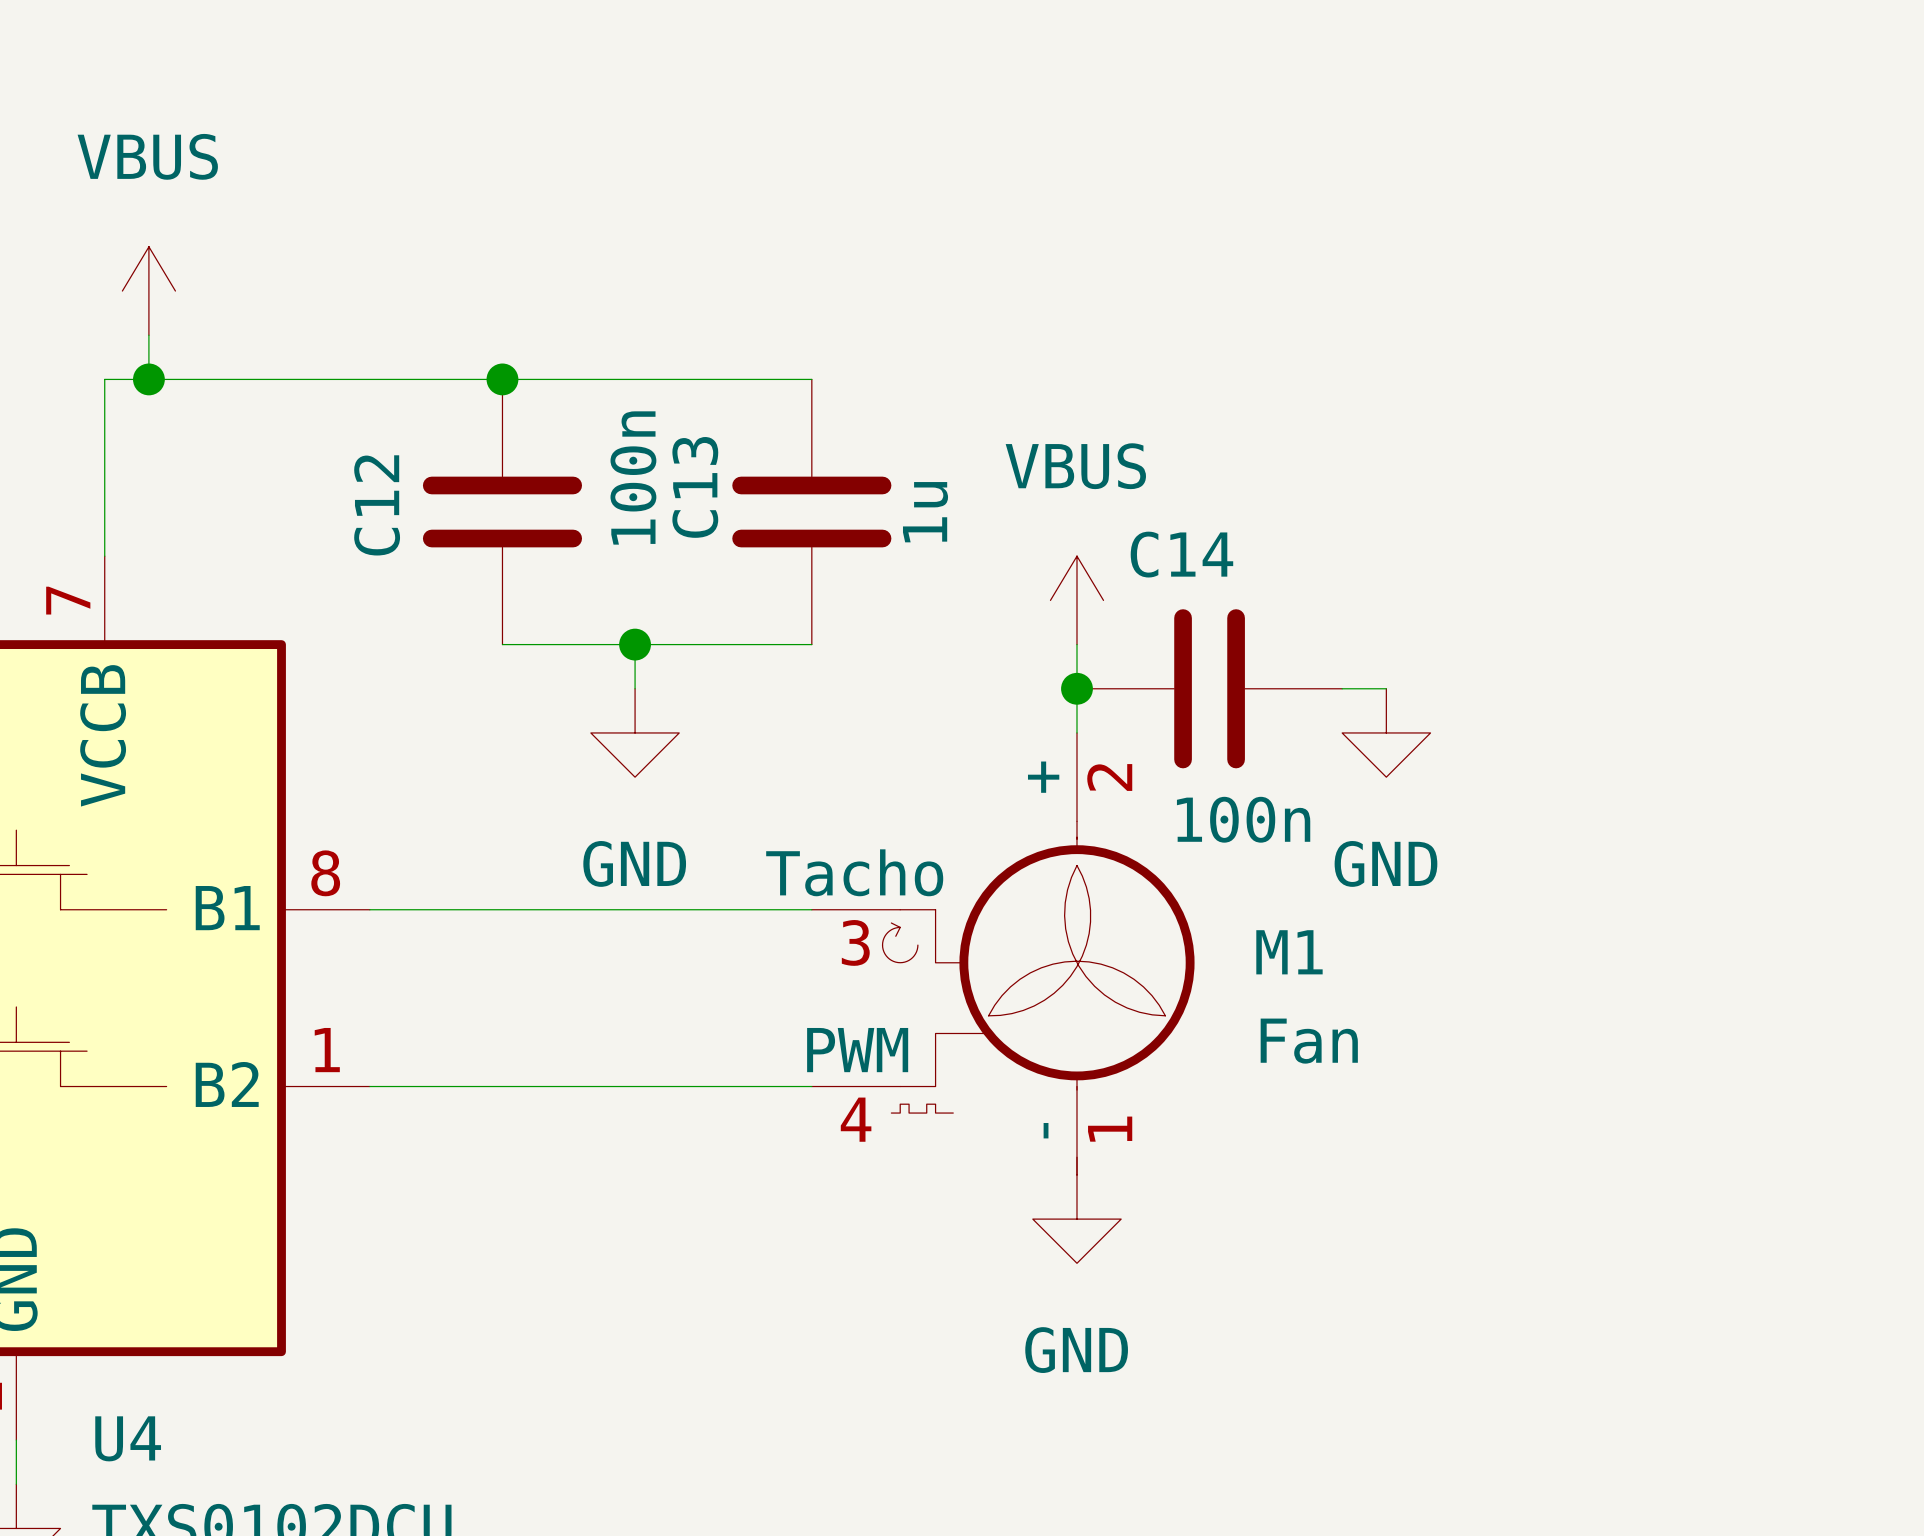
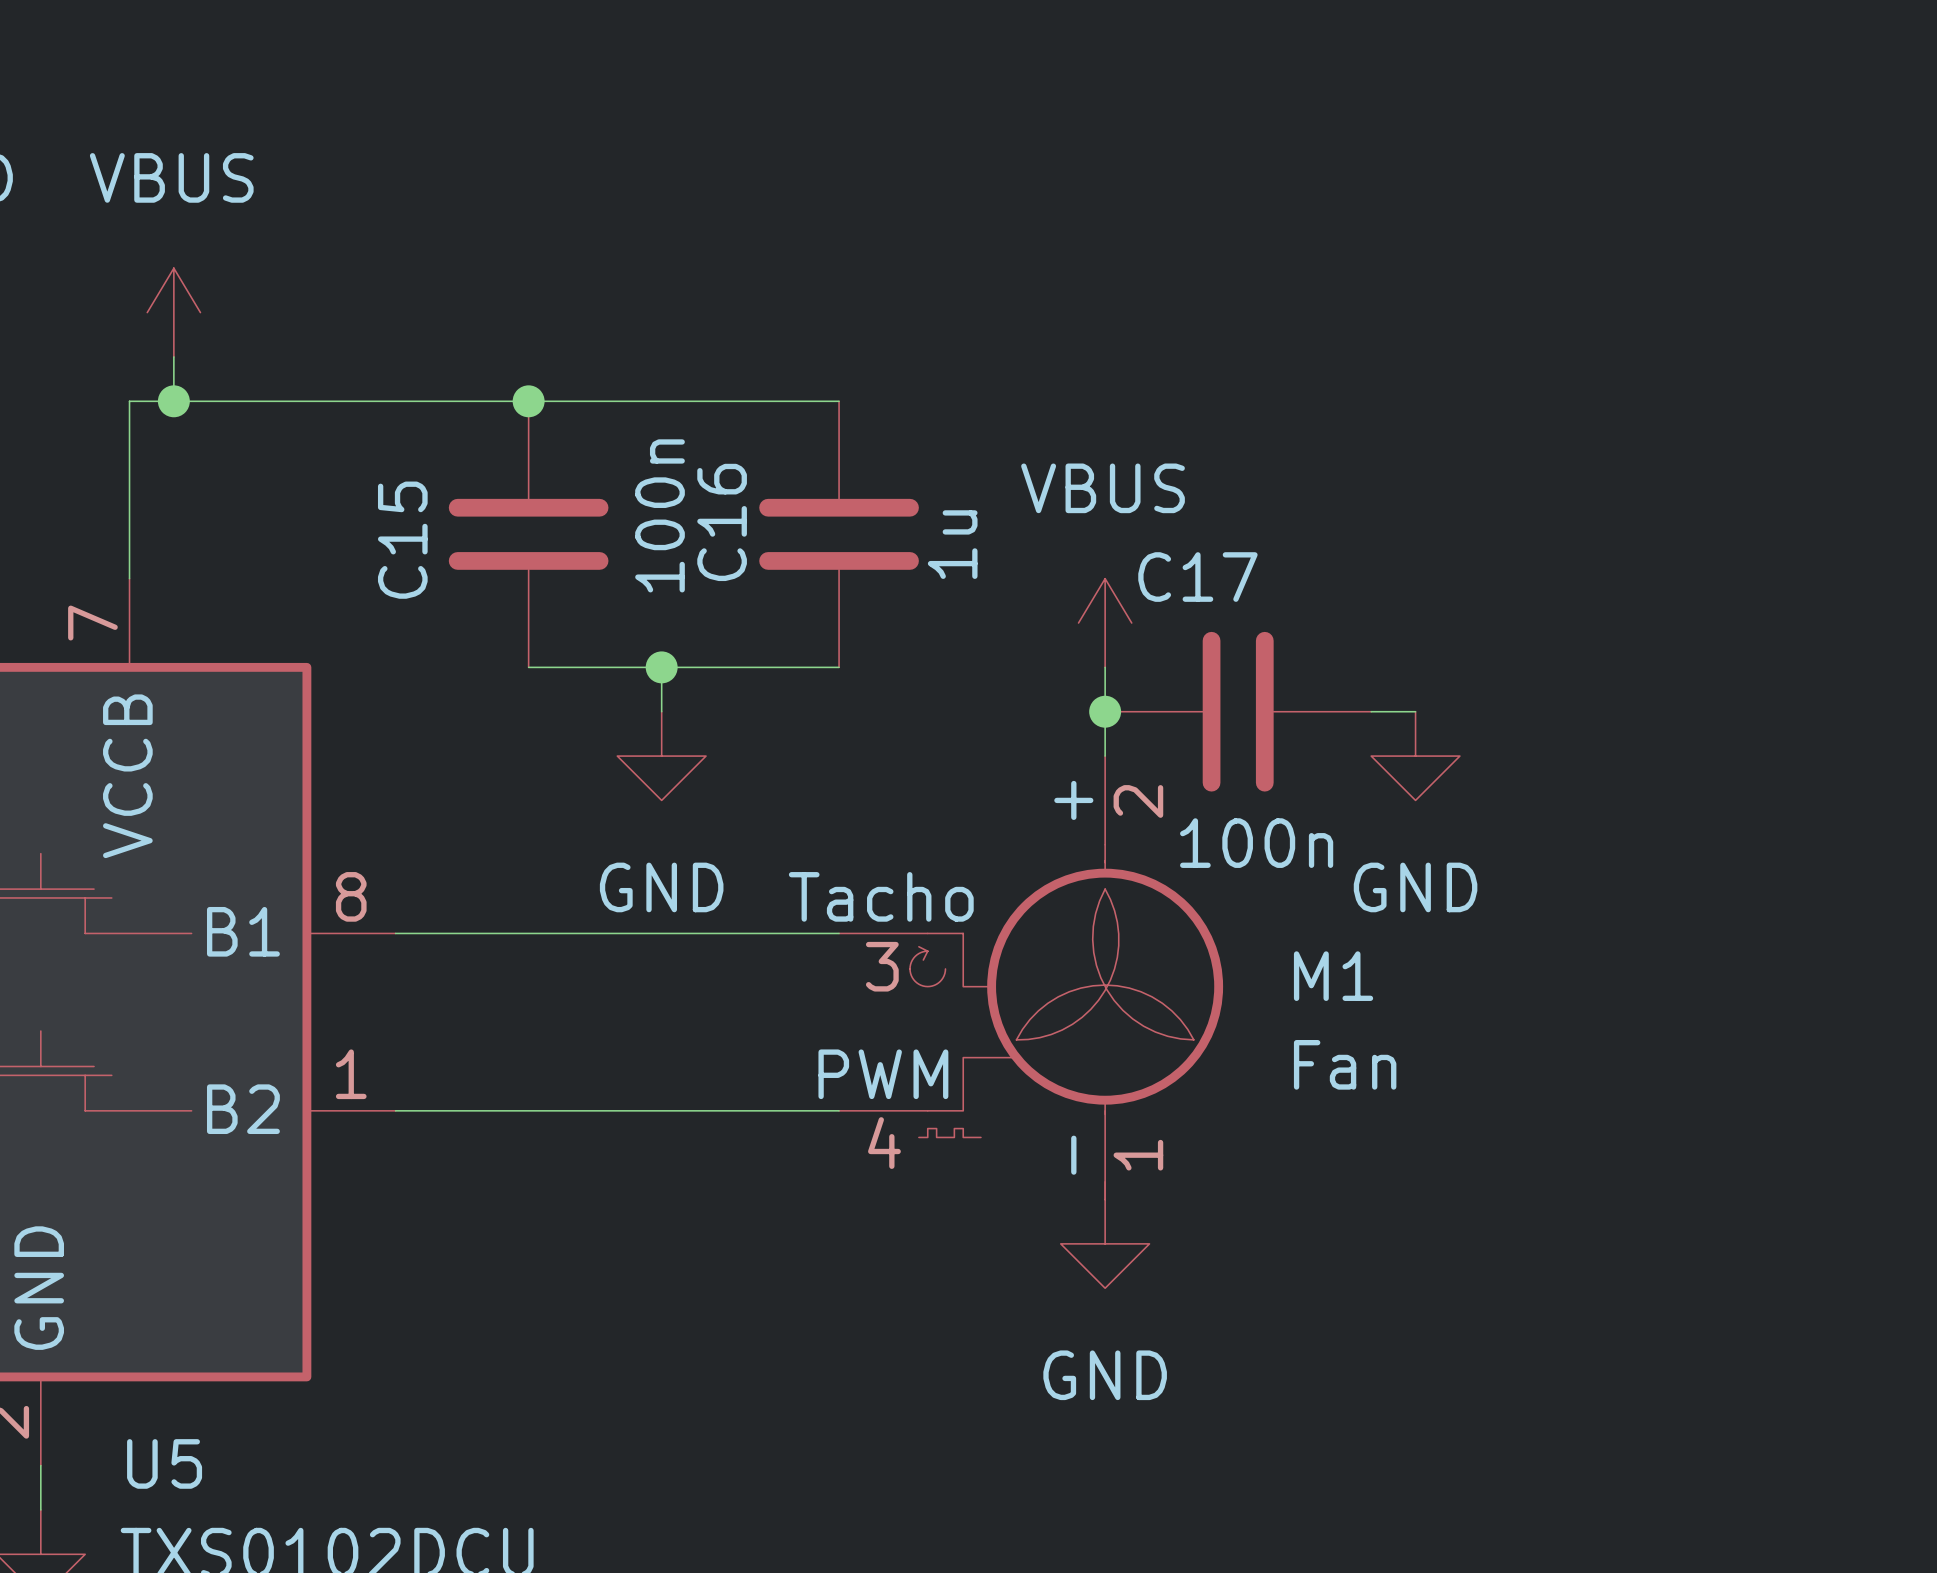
C13 name: C13 (695, 487) -> C16 (722, 522)
C12 name: C12 (377, 505) -> C15 (402, 540)
C14 name: C14 (1181, 554) -> C17 (1197, 577)
U4 name: U4 (128, 1438) -> U5 (164, 1463)

